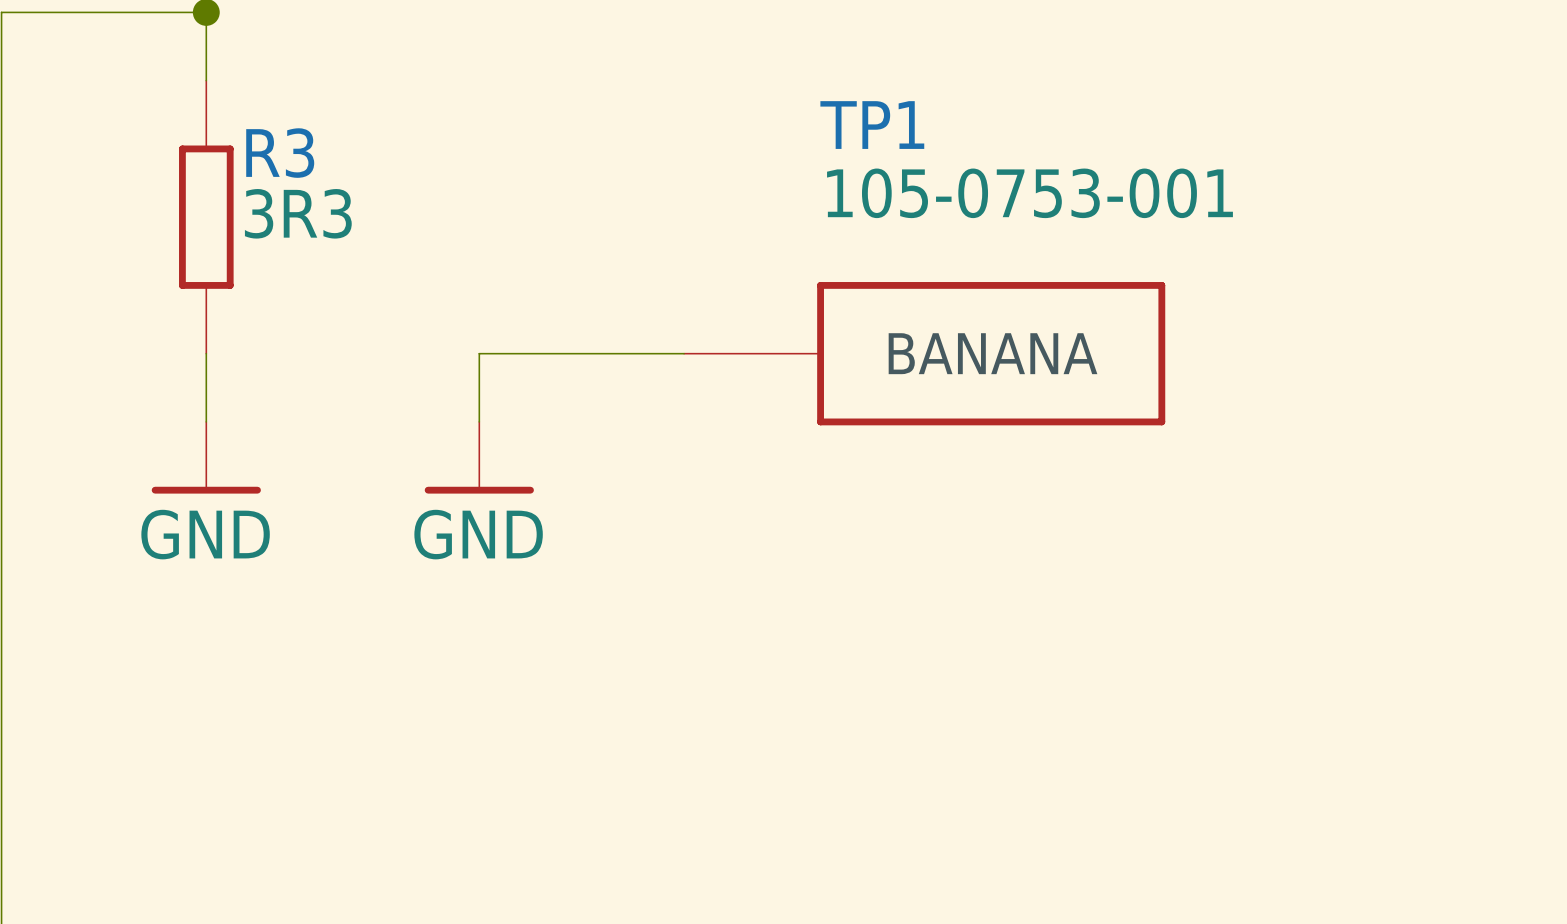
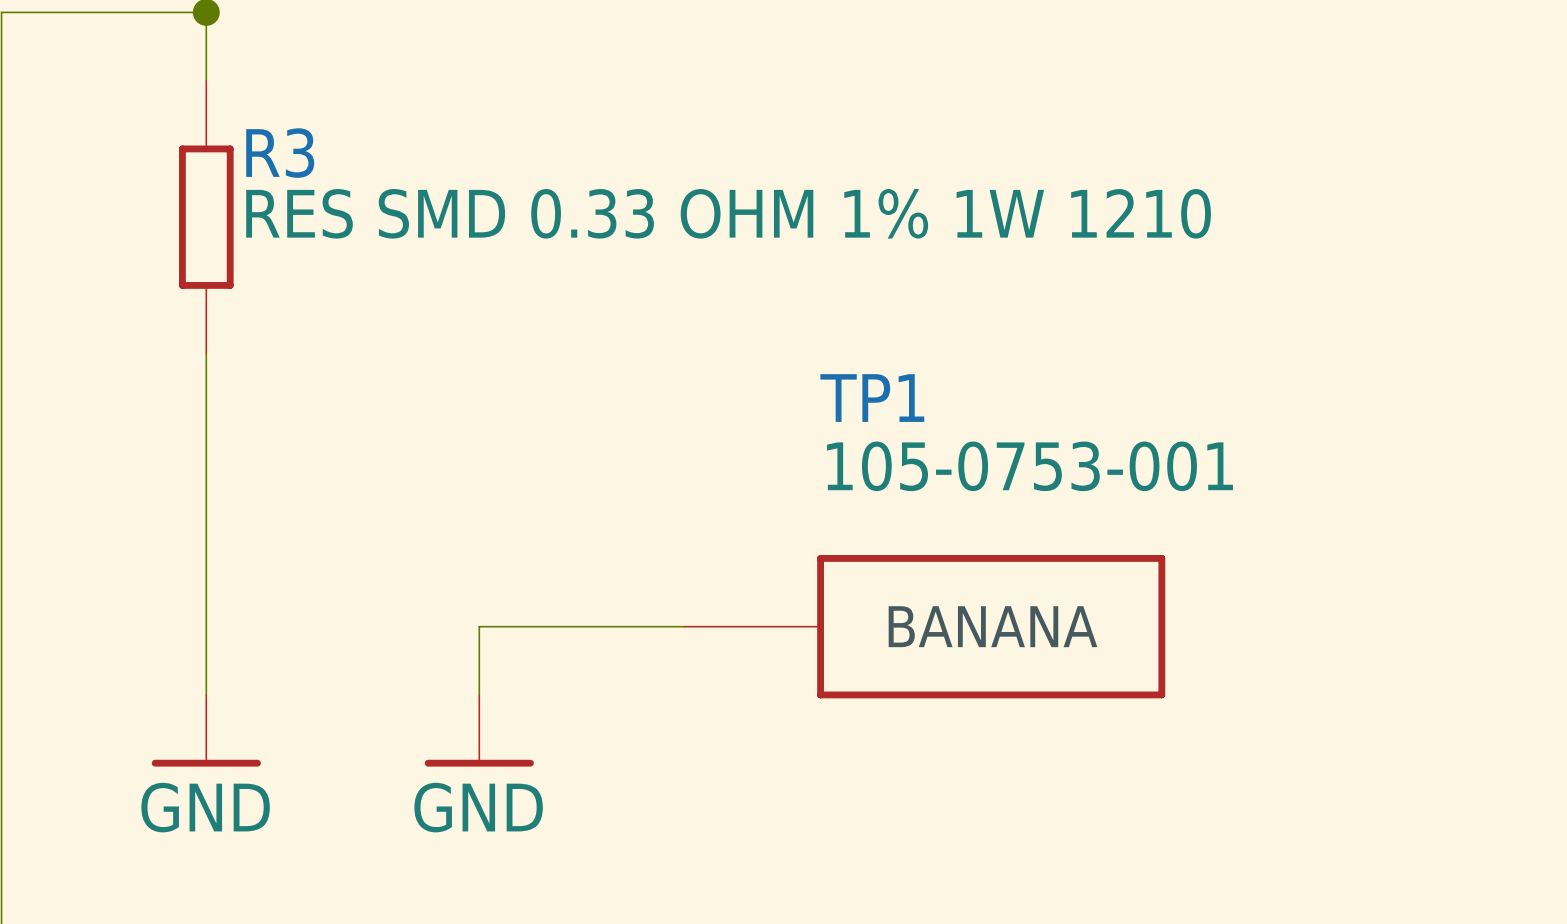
R3 value: 3R3 (298, 213) -> RES SMD 0.33 OHM 1% 1W 1210 (728, 213)
wire: (684, 353) (479, 353) (479, 421) -> (684, 626) (479, 626) (479, 694)
TP1 position: (924, 353) -> (924, 626)
wire: none -> (206, 421) (206, 694)
power symbol: GND (206, 457) -> none
power symbol: GND (479, 457) -> none
power symbol: none -> GND (206, 730)
power symbol: none -> GND (479, 730)

